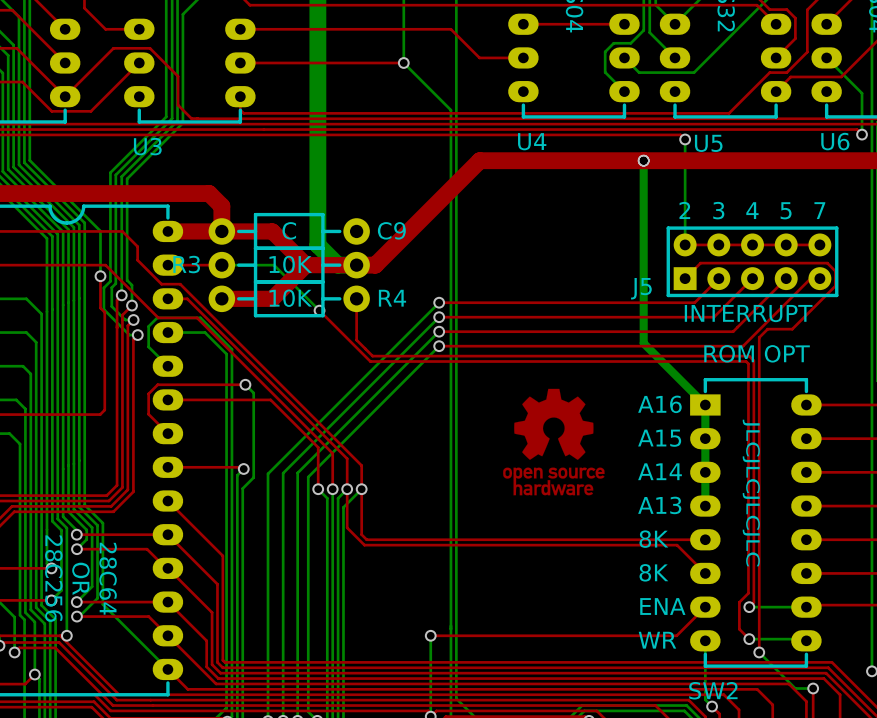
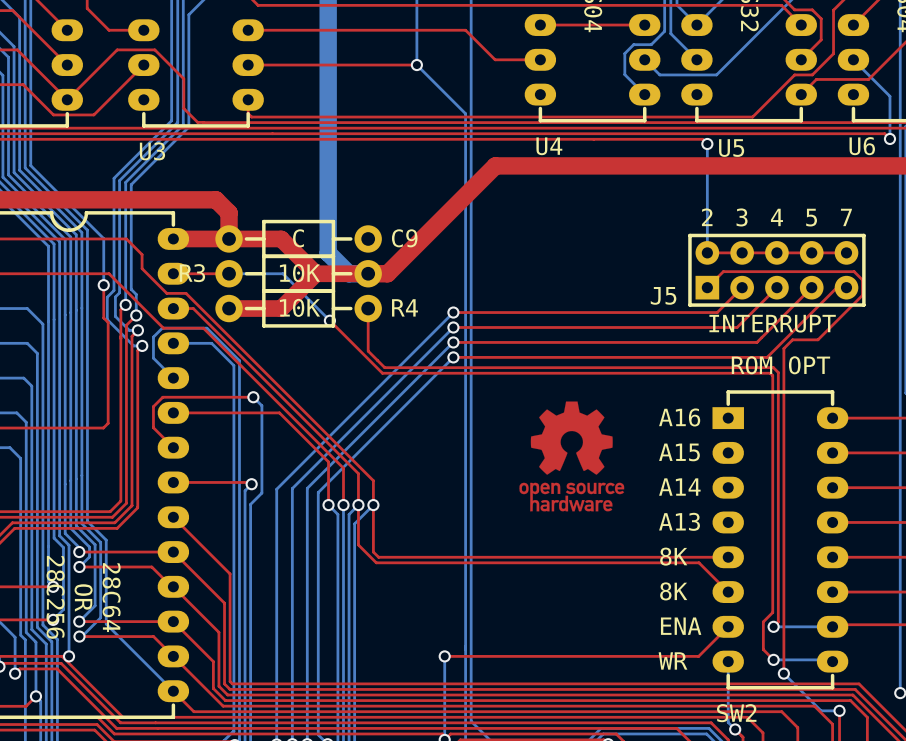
bottom track: (643, 160) (643, 343) (705, 404) (705, 506) -> none
via: (643, 160) -> none
text: JLCJLCJLCJLC (751, 493) -> none

